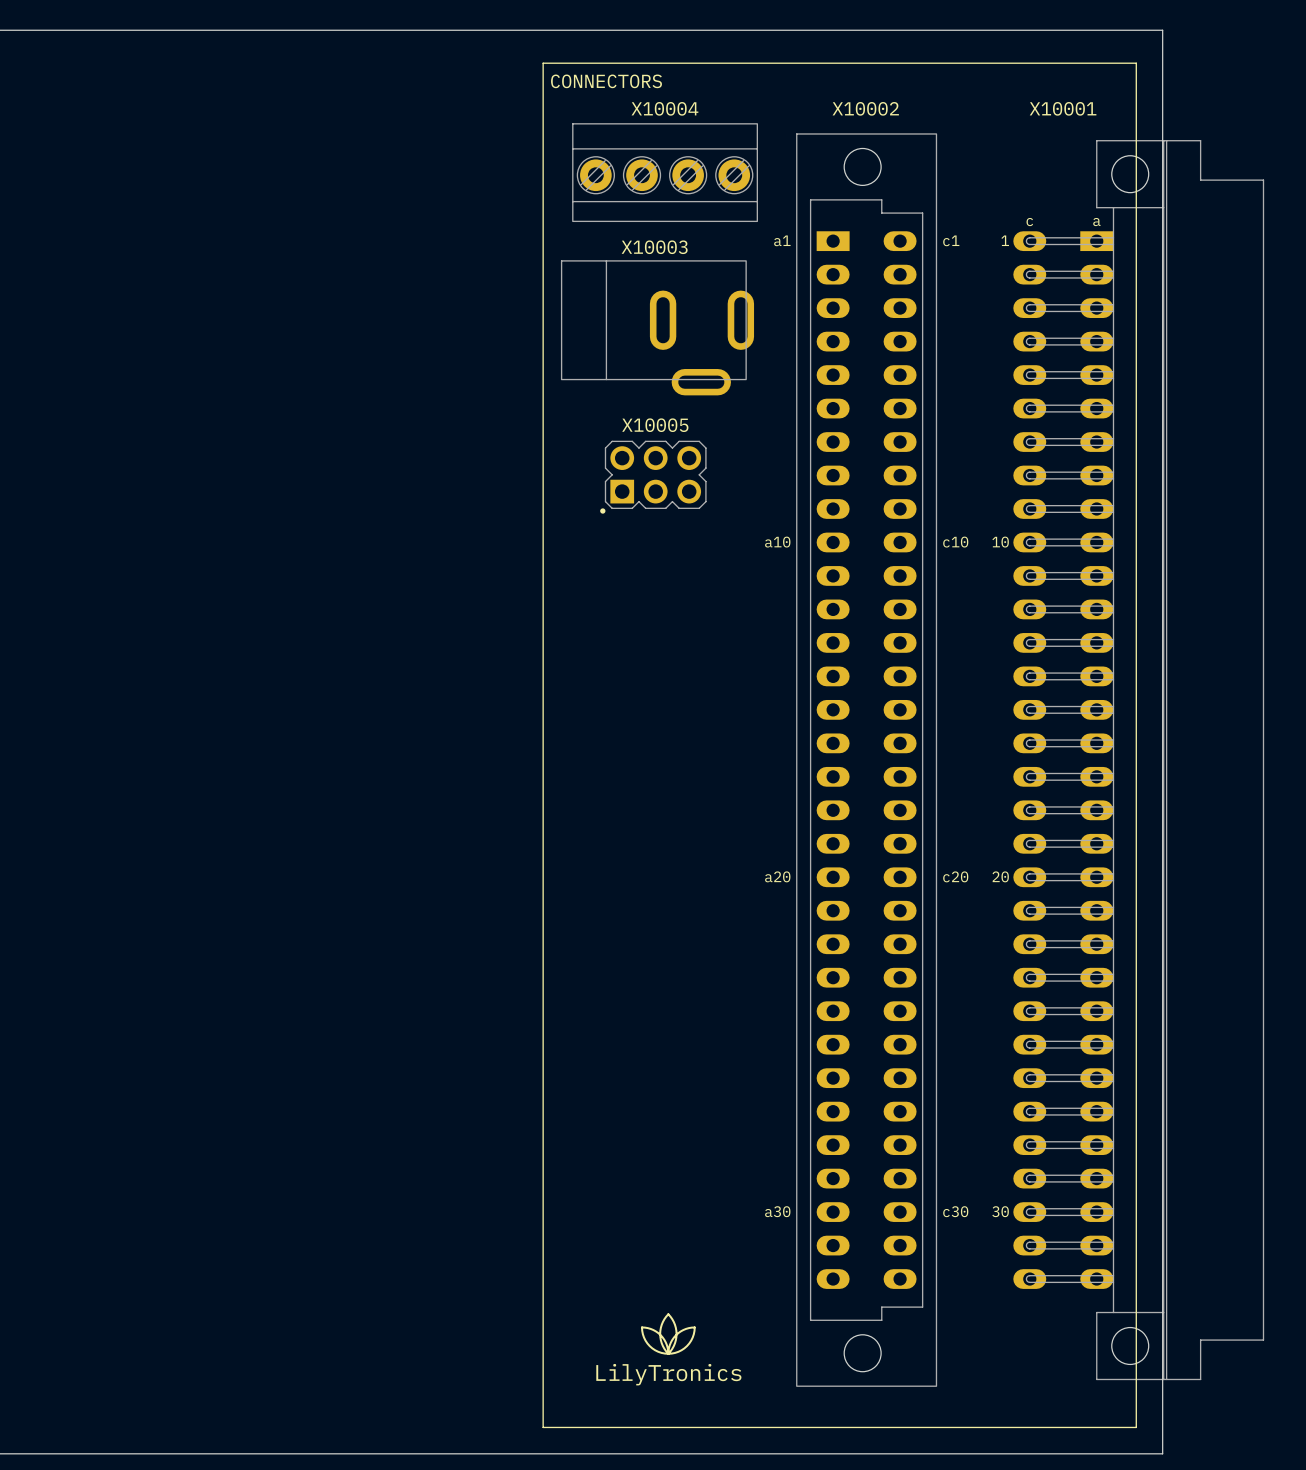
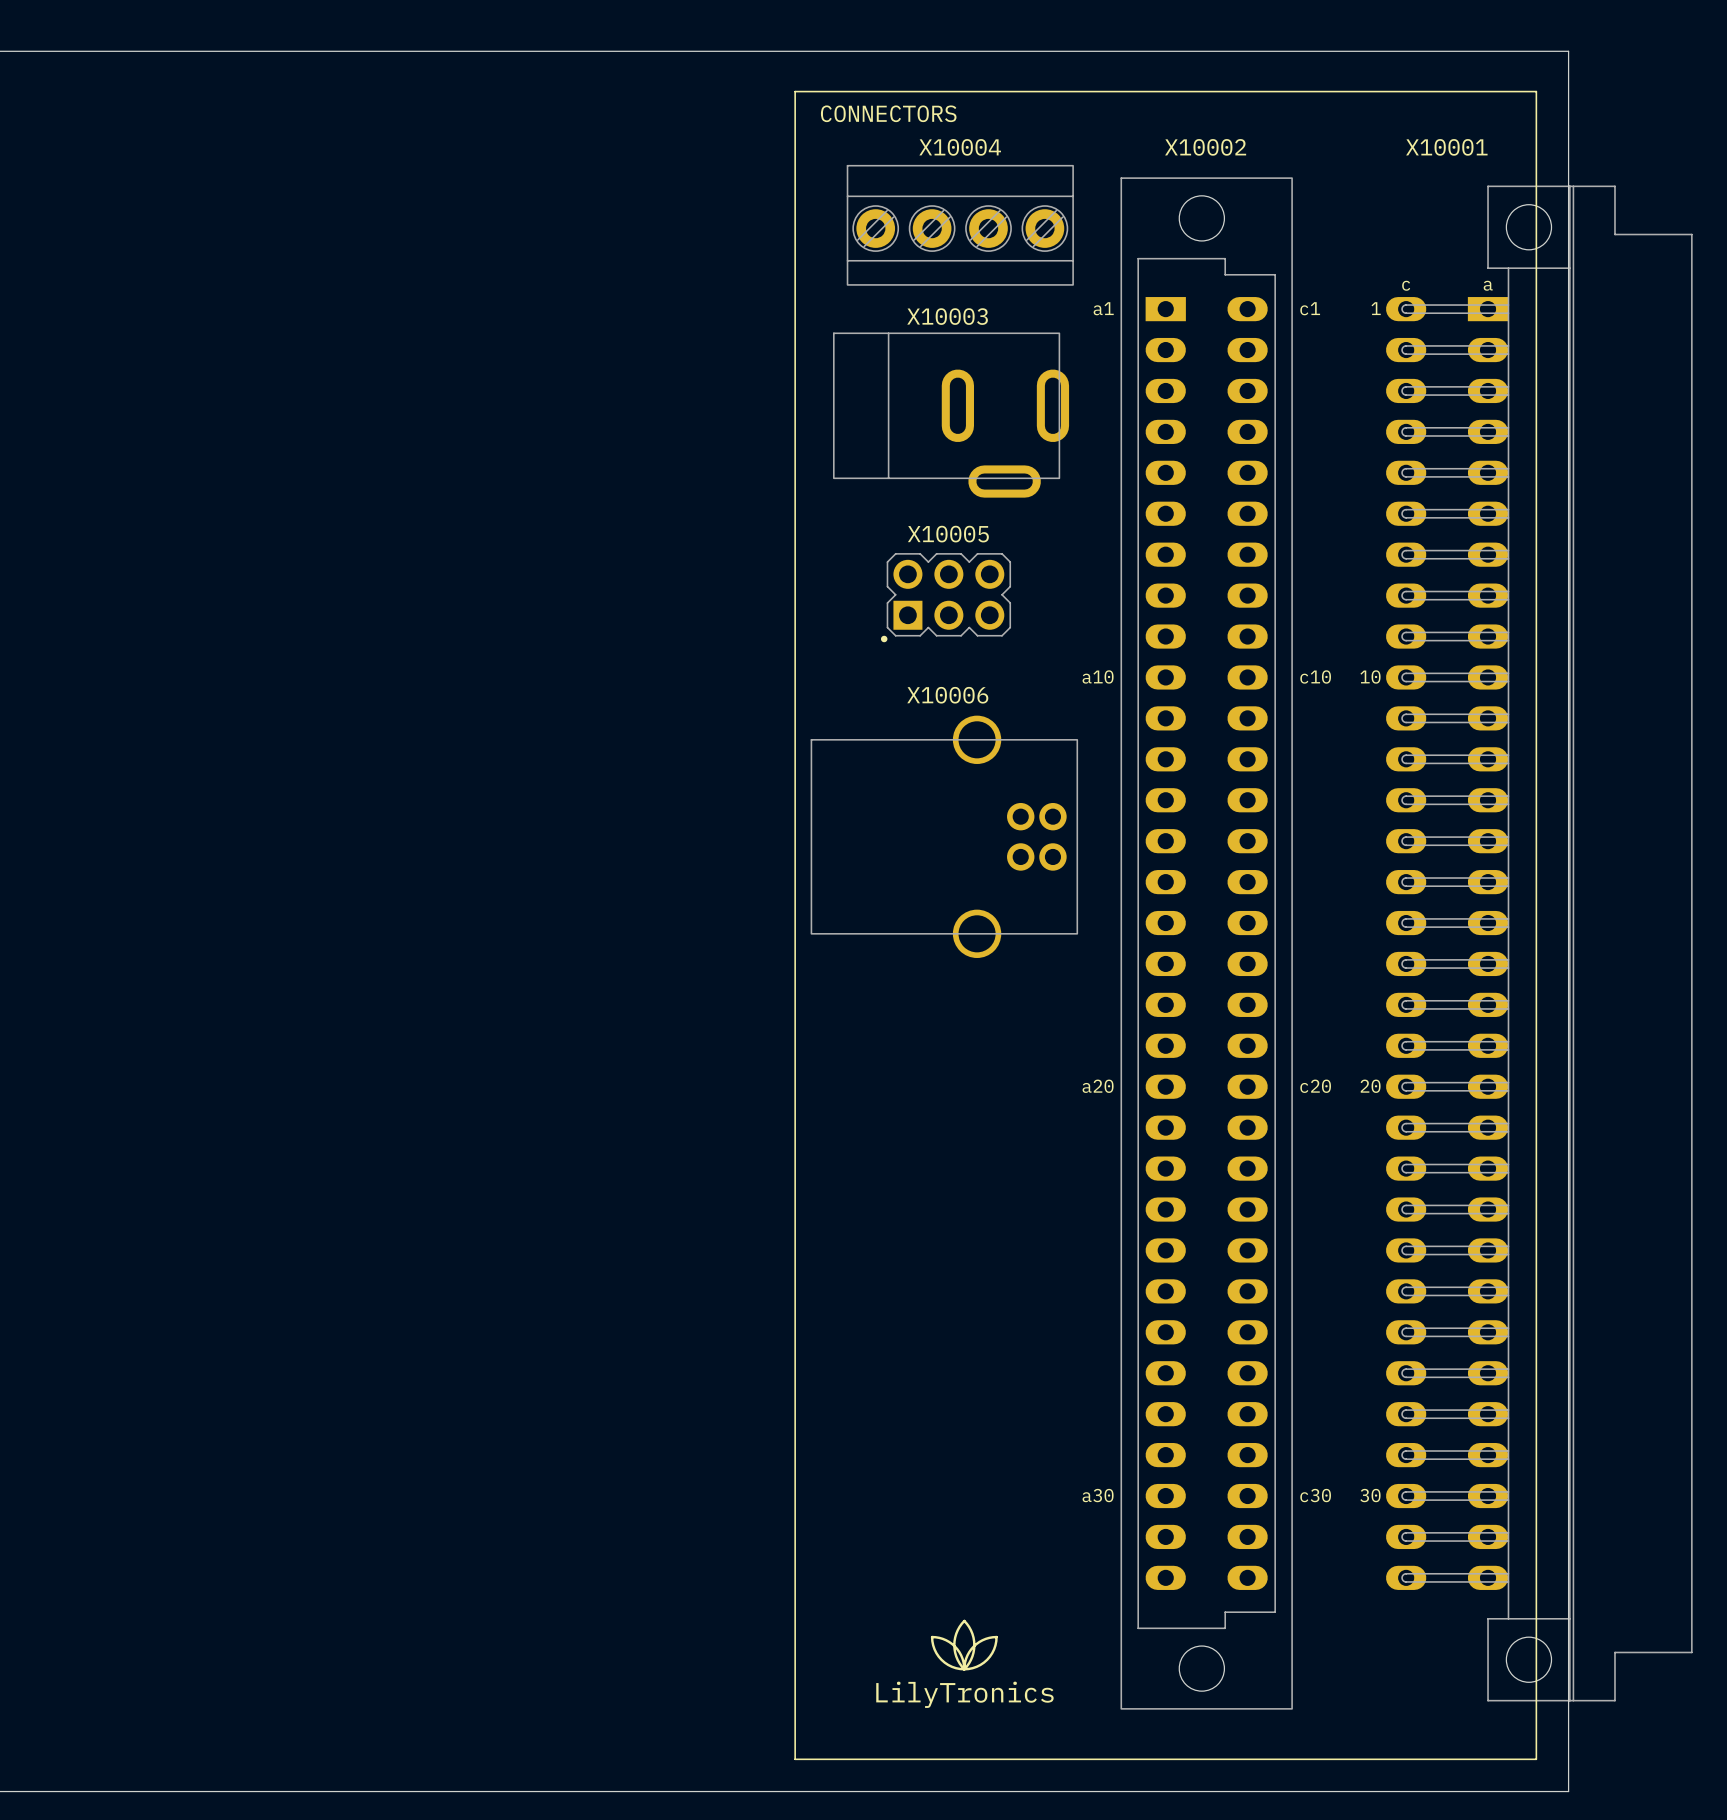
line: (543, 63) (543, 1427) -> (811, 91) (795, 91) (795, 1759) (811, 1759)
X10006: none -> (944, 836)

